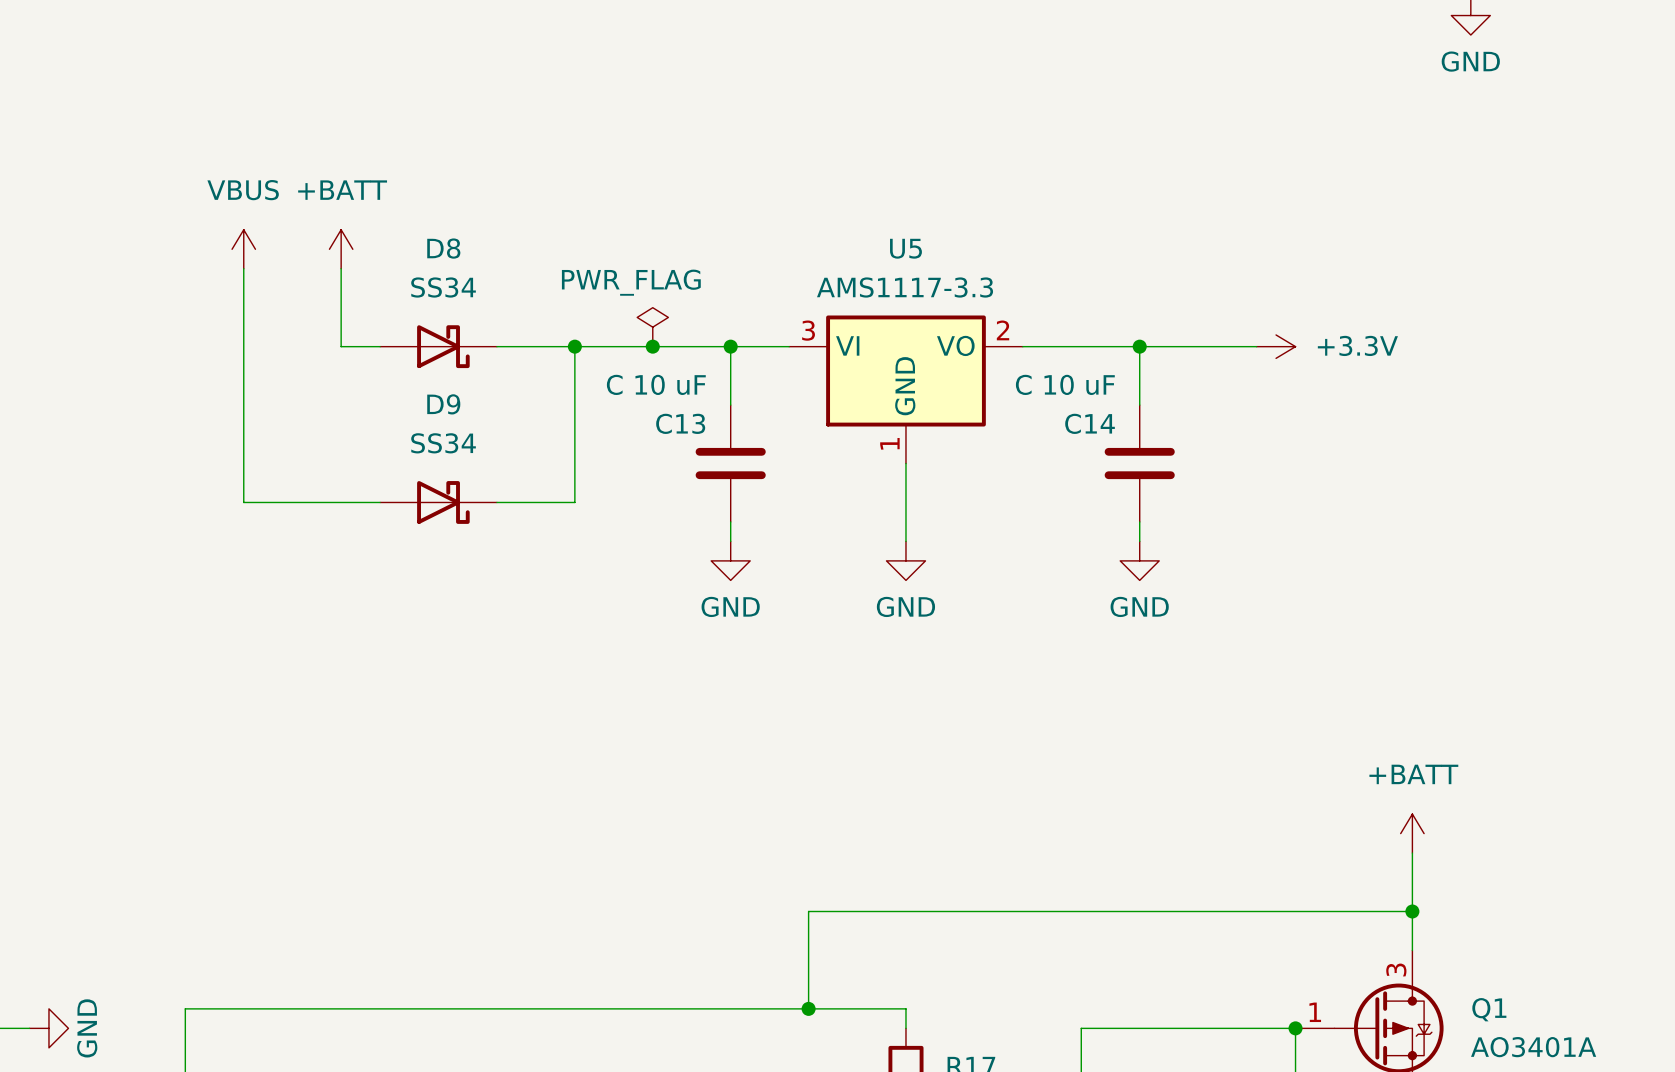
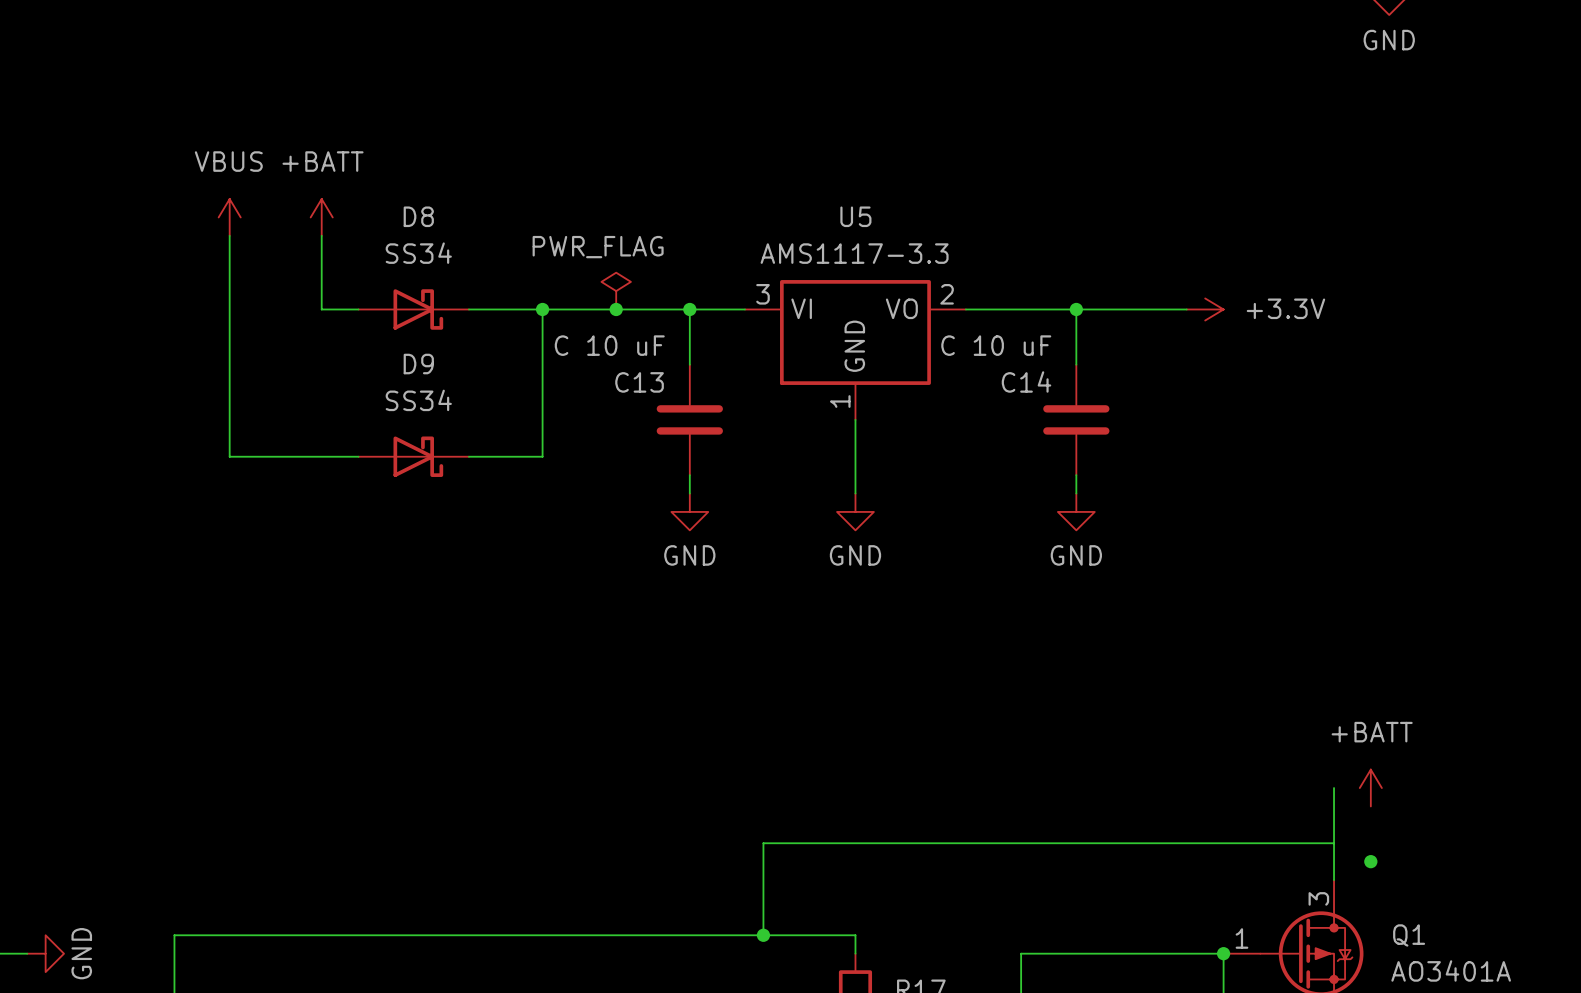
power symbol position: +BATT (1412, 833) -> +BATT (1370, 788)
junction position: (1412, 911) -> (1370, 861)

